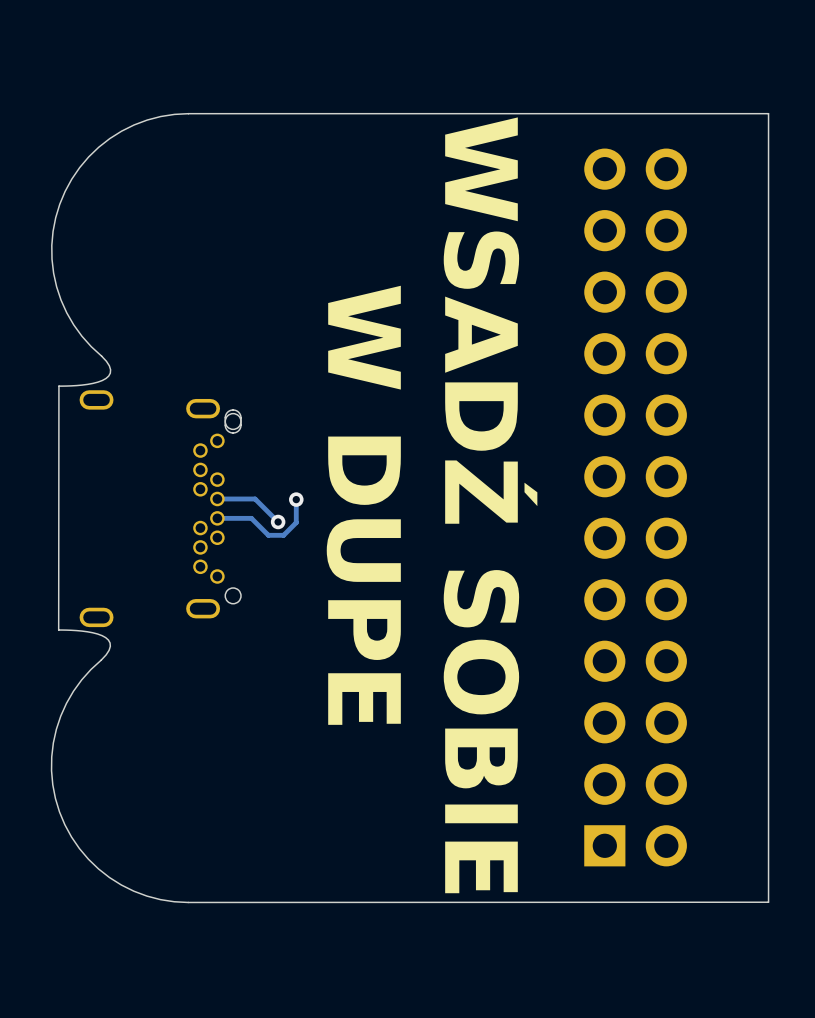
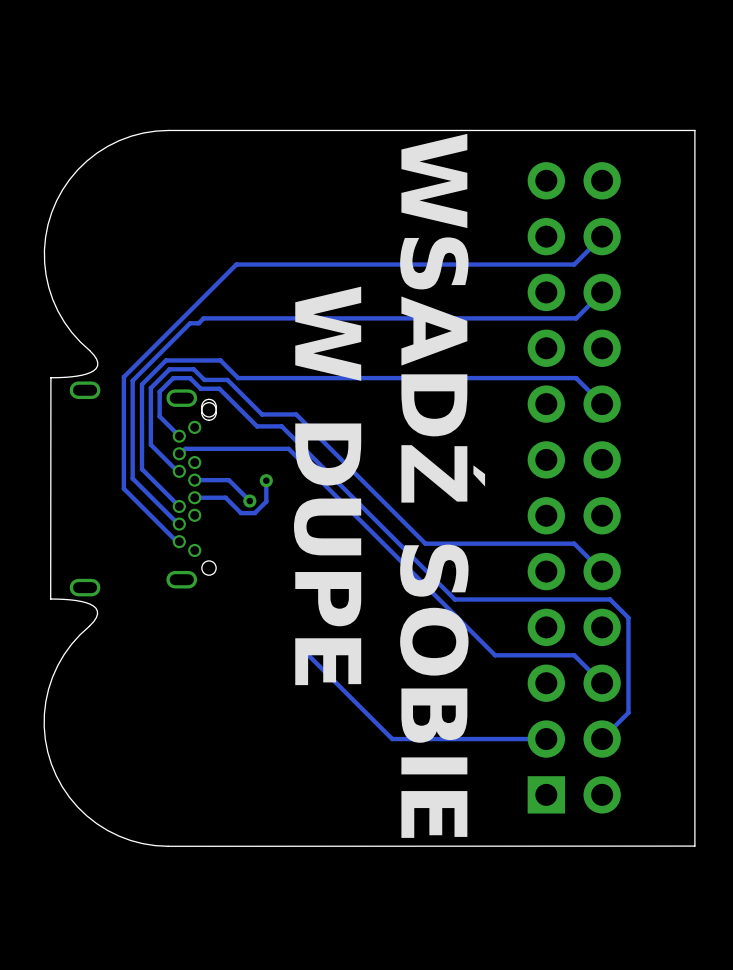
track: none -> (602, 236) (574, 264) (236, 264) (123, 377) (123, 488) (176, 541) (179, 541)
track: none -> (602, 292) (576, 318) (203, 318) (198, 323) (190, 323) (132, 380) (132, 478) (179, 524)
track: none -> (602, 404) (576, 378) (238, 378) (220, 360) (165, 360) (141, 384) (141, 469) (179, 506)
track: none -> (179, 436) (159, 416) (159, 391) (173, 378) (190, 378) (200, 388) (219, 388) (257, 426) (281, 426) (454, 599) (610, 599) (628, 617) (628, 712) (602, 739)
track: none -> (179, 453) (185, 448) (288, 448) (495, 655) (574, 655) (602, 683)
track: none -> (179, 471) (150, 444) (150, 388) (169, 369) (193, 369) (204, 379) (227, 379) (262, 414) (296, 414) (425, 543) (574, 543) (602, 571)
track: none -> (303, 650) (392, 739) (546, 739)

